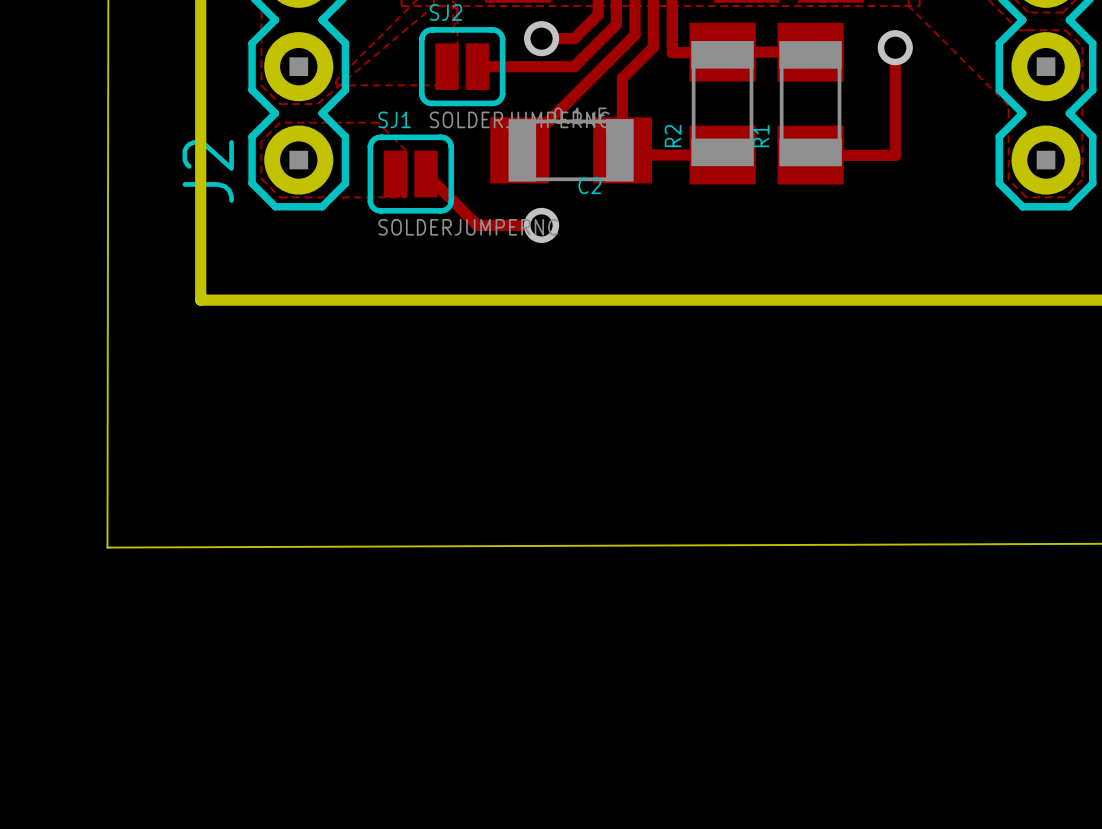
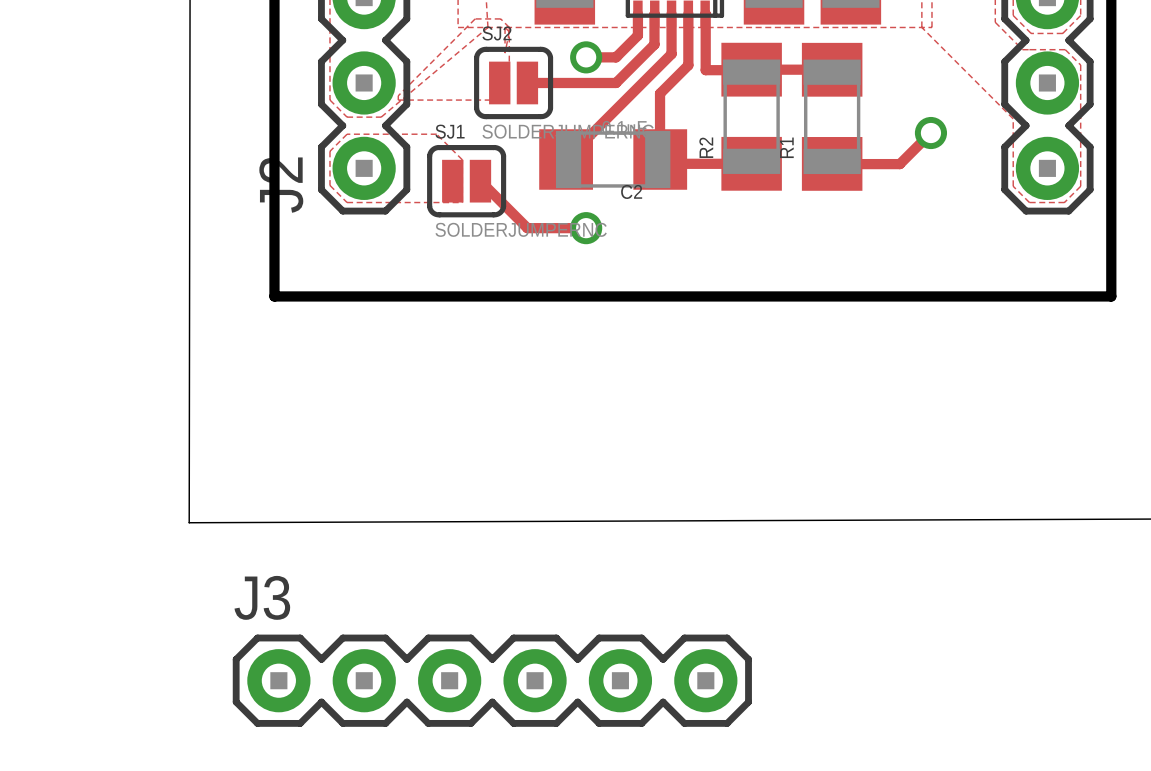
track: (895, 47) (895, 155) (884, 155) -> (930, 133) (899, 164)
via position: (895, 47) -> (930, 133)
J3: none -> (492, 680)

